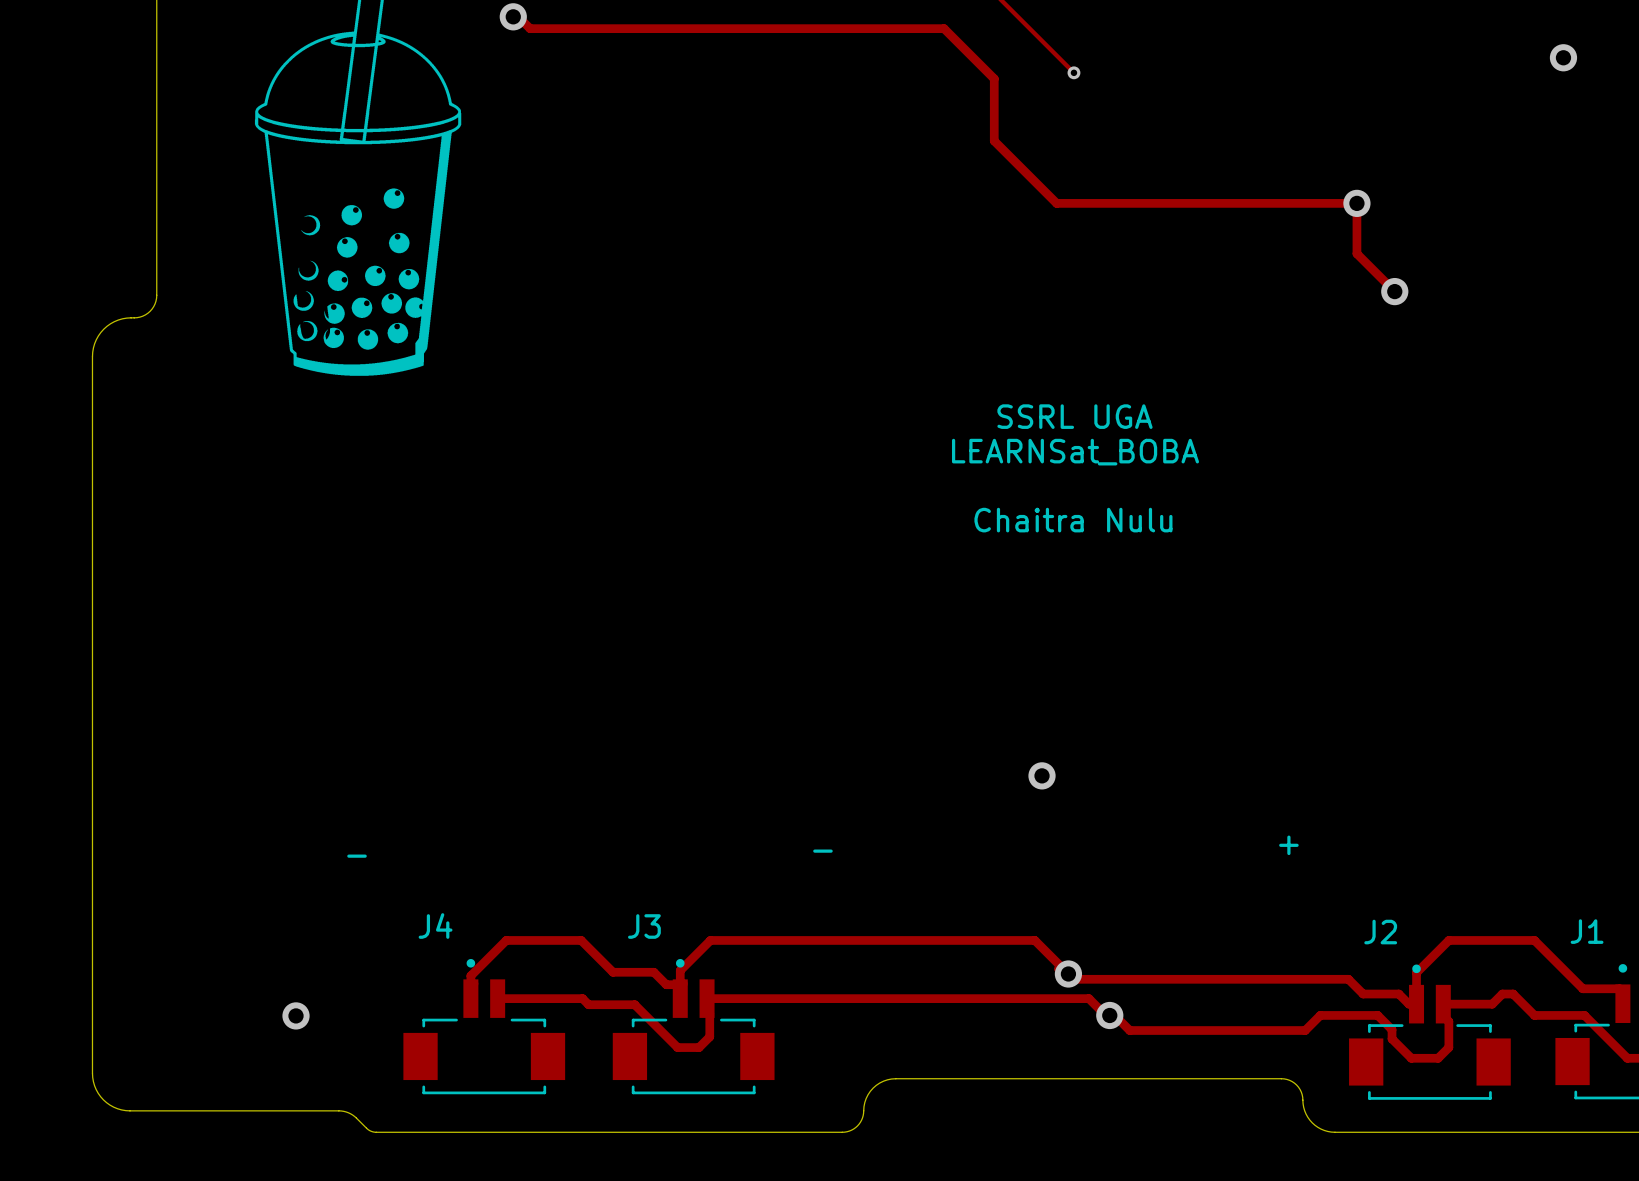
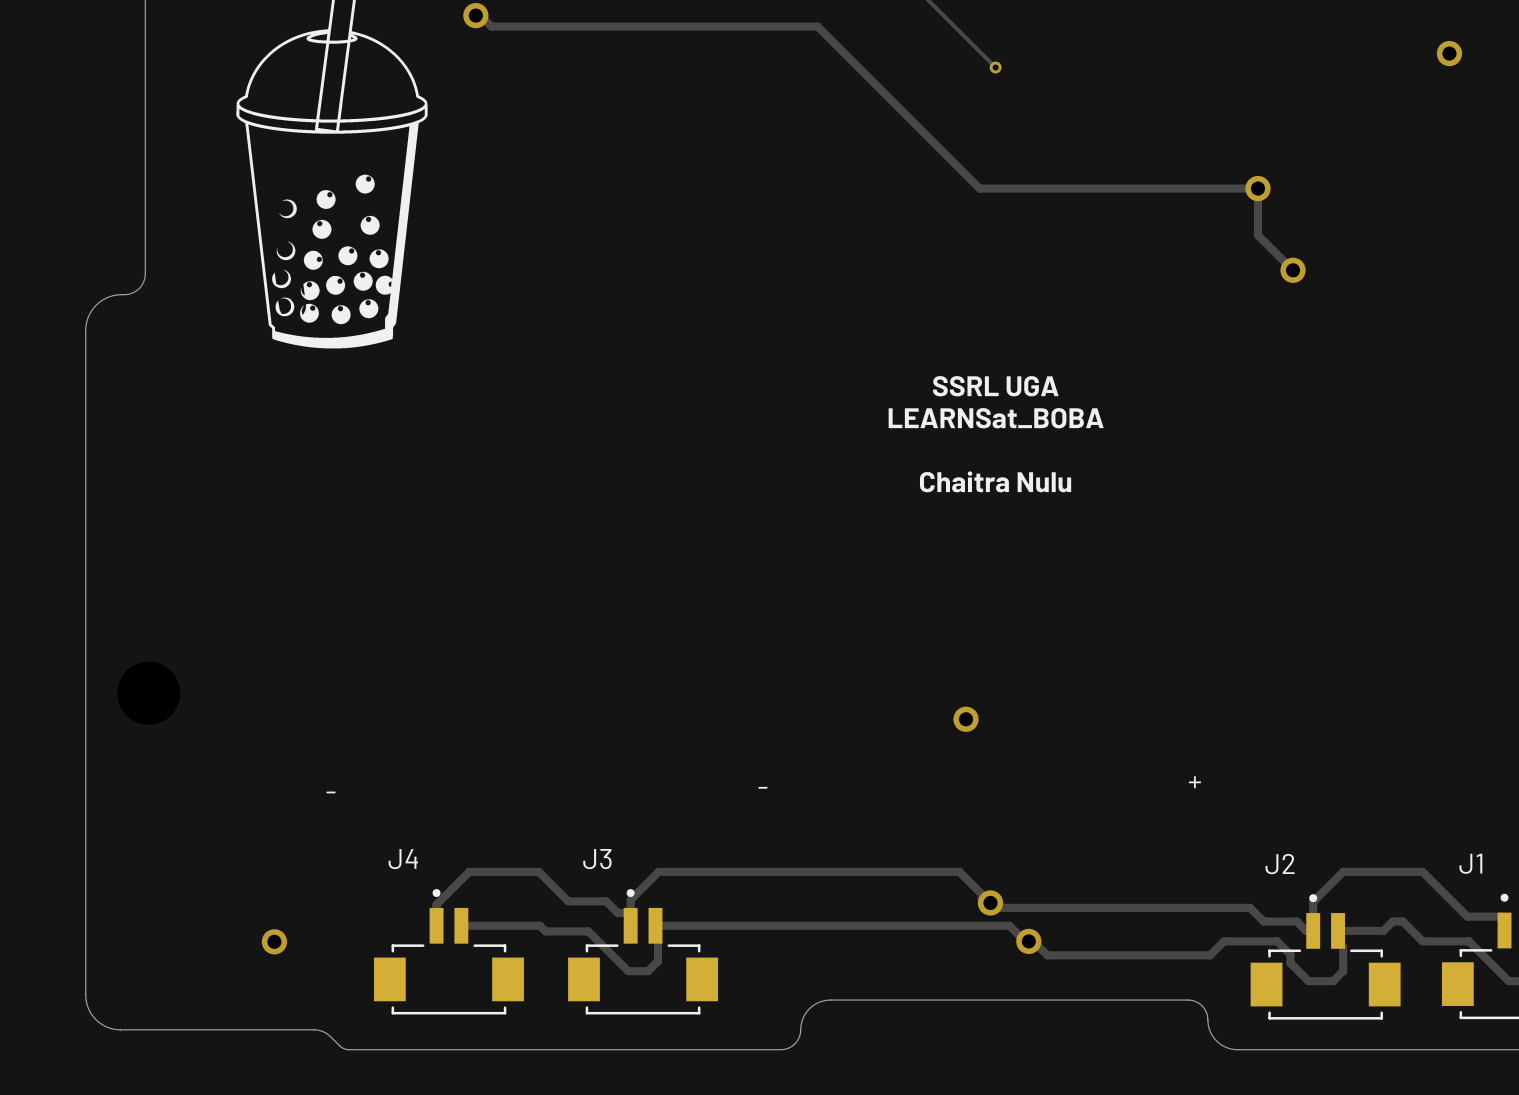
track: (881, 28) (944, 28) (994, 78) (994, 140) -> (817, 26) (921, 130)

